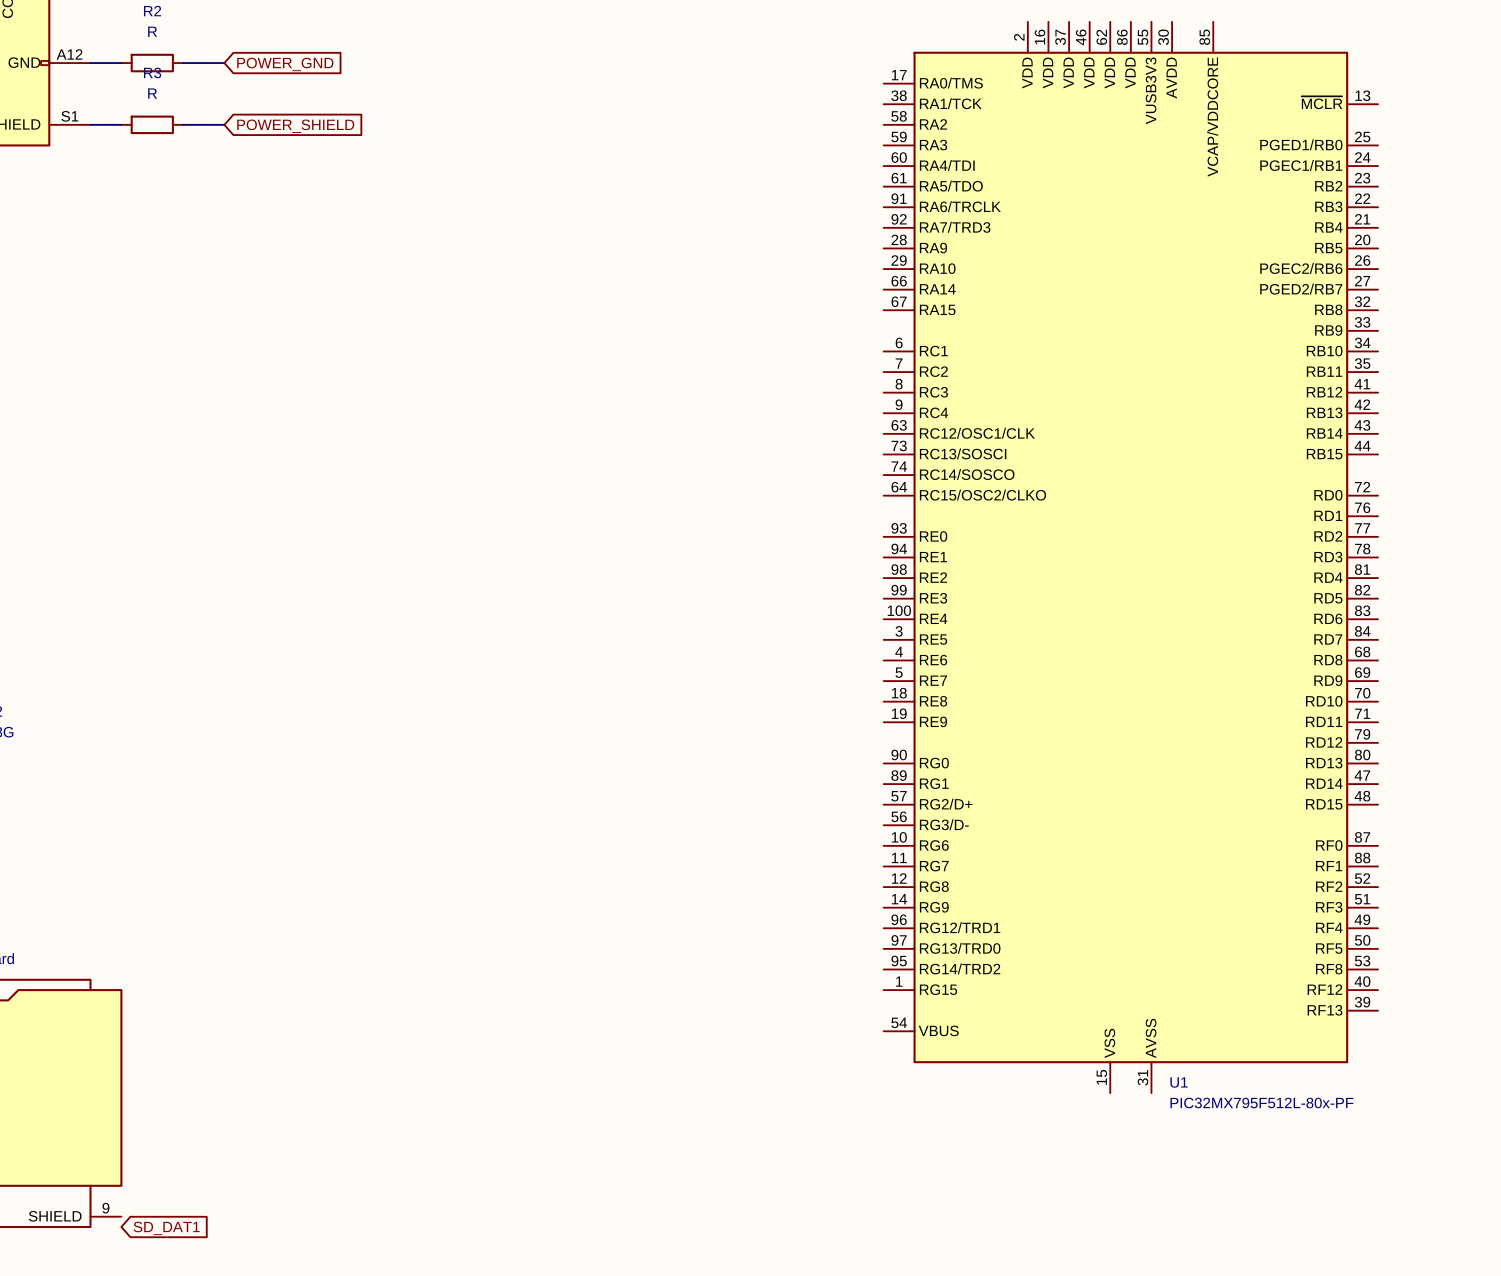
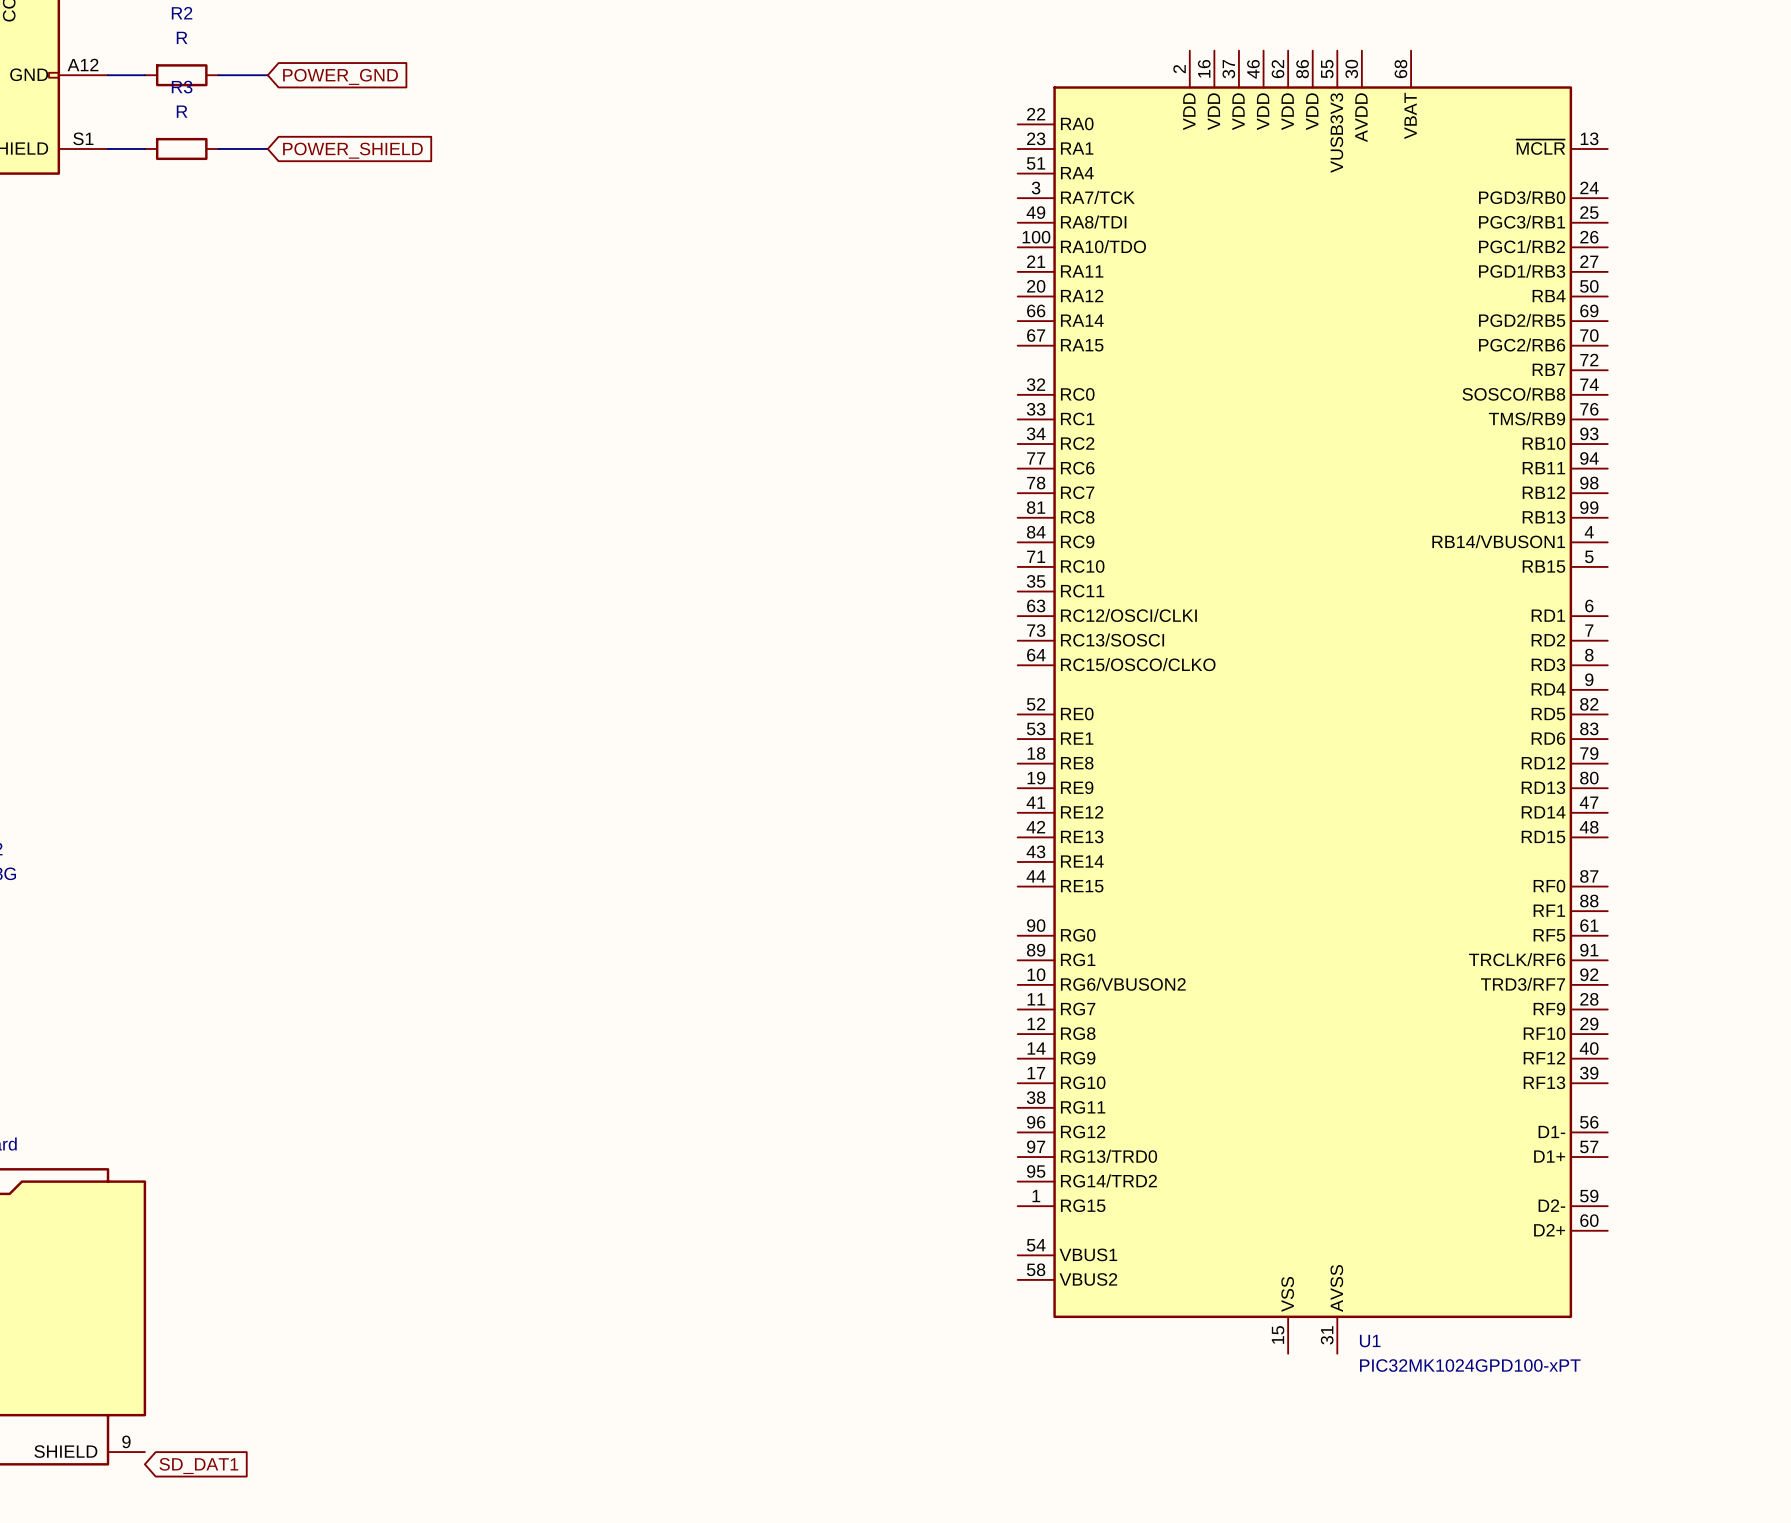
U1 symbol: [883, 21, 1379, 1094] -> [1017, 50, 1608, 1354]
U1 value: PIC32MX795F512L-80x-PF (1261, 1103) -> PIC32MK1024GPD100-xPT (1470, 1365)

